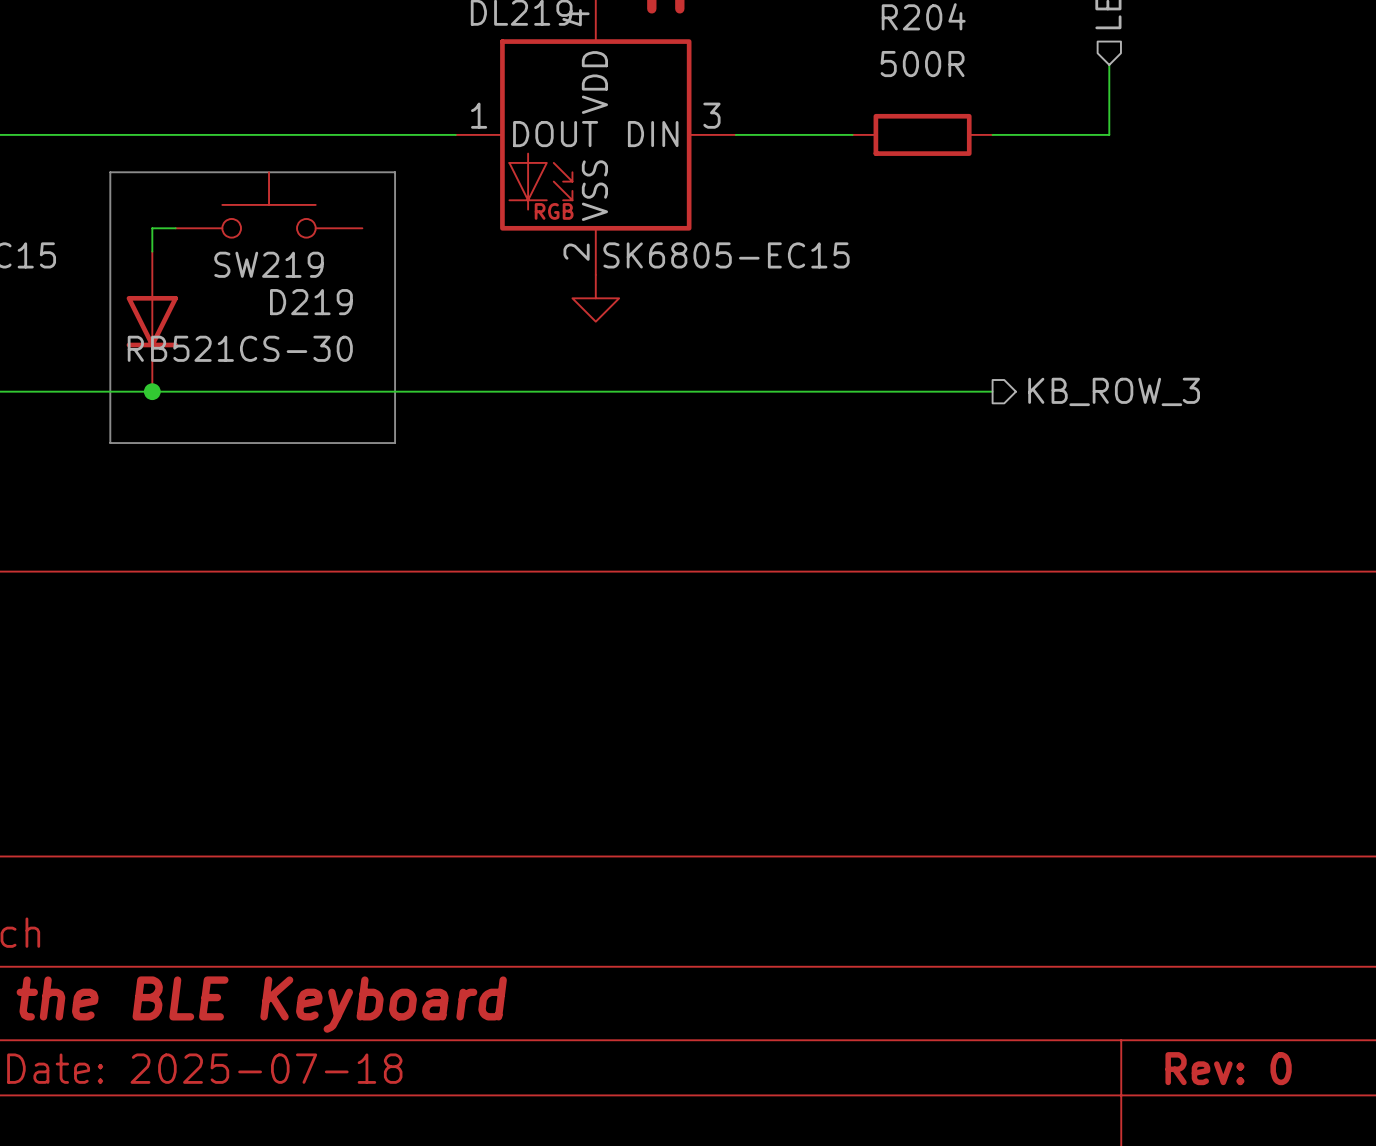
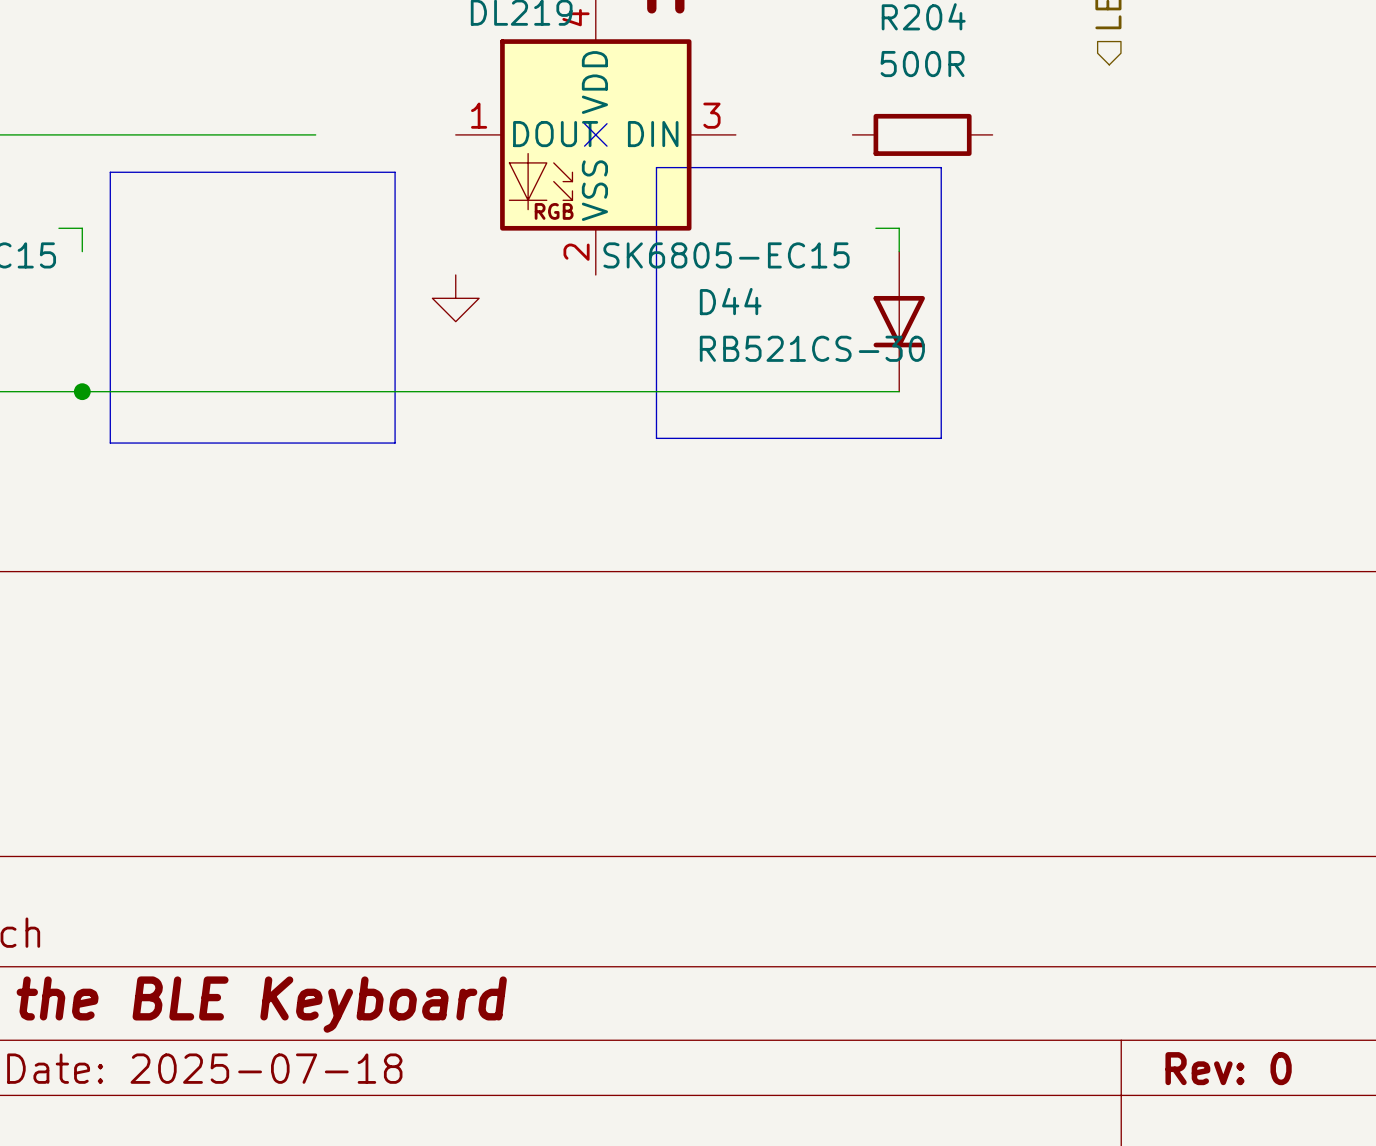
wire: (1109, 64) (1109, 134) (992, 134) -> none
wire: (315, 134) (455, 134) -> none
no-connect mark: none -> (595, 134)
wire: (735, 134) (852, 134) -> none
line: none -> (656, 167) (656, 438) (941, 438) (941, 167) (656, 167)
SW219: (269, 204) -> none
wire: none -> (58, 228) (82, 228) (82, 251)
wire: (175, 228) (152, 228) (152, 251) -> none
wire: none -> (875, 228) (899, 228) (899, 251)
power symbol position: (595, 298) -> (455, 298)
D219: RB521CS-30 (152, 321) -> none
D44: none -> RB521CS-30 (899, 321)
junction position: (152, 391) -> (82, 391)
wire: (899, 391) (992, 391) -> none
hierarchical label: KB_ROW_3 (1114, 391) -> none

